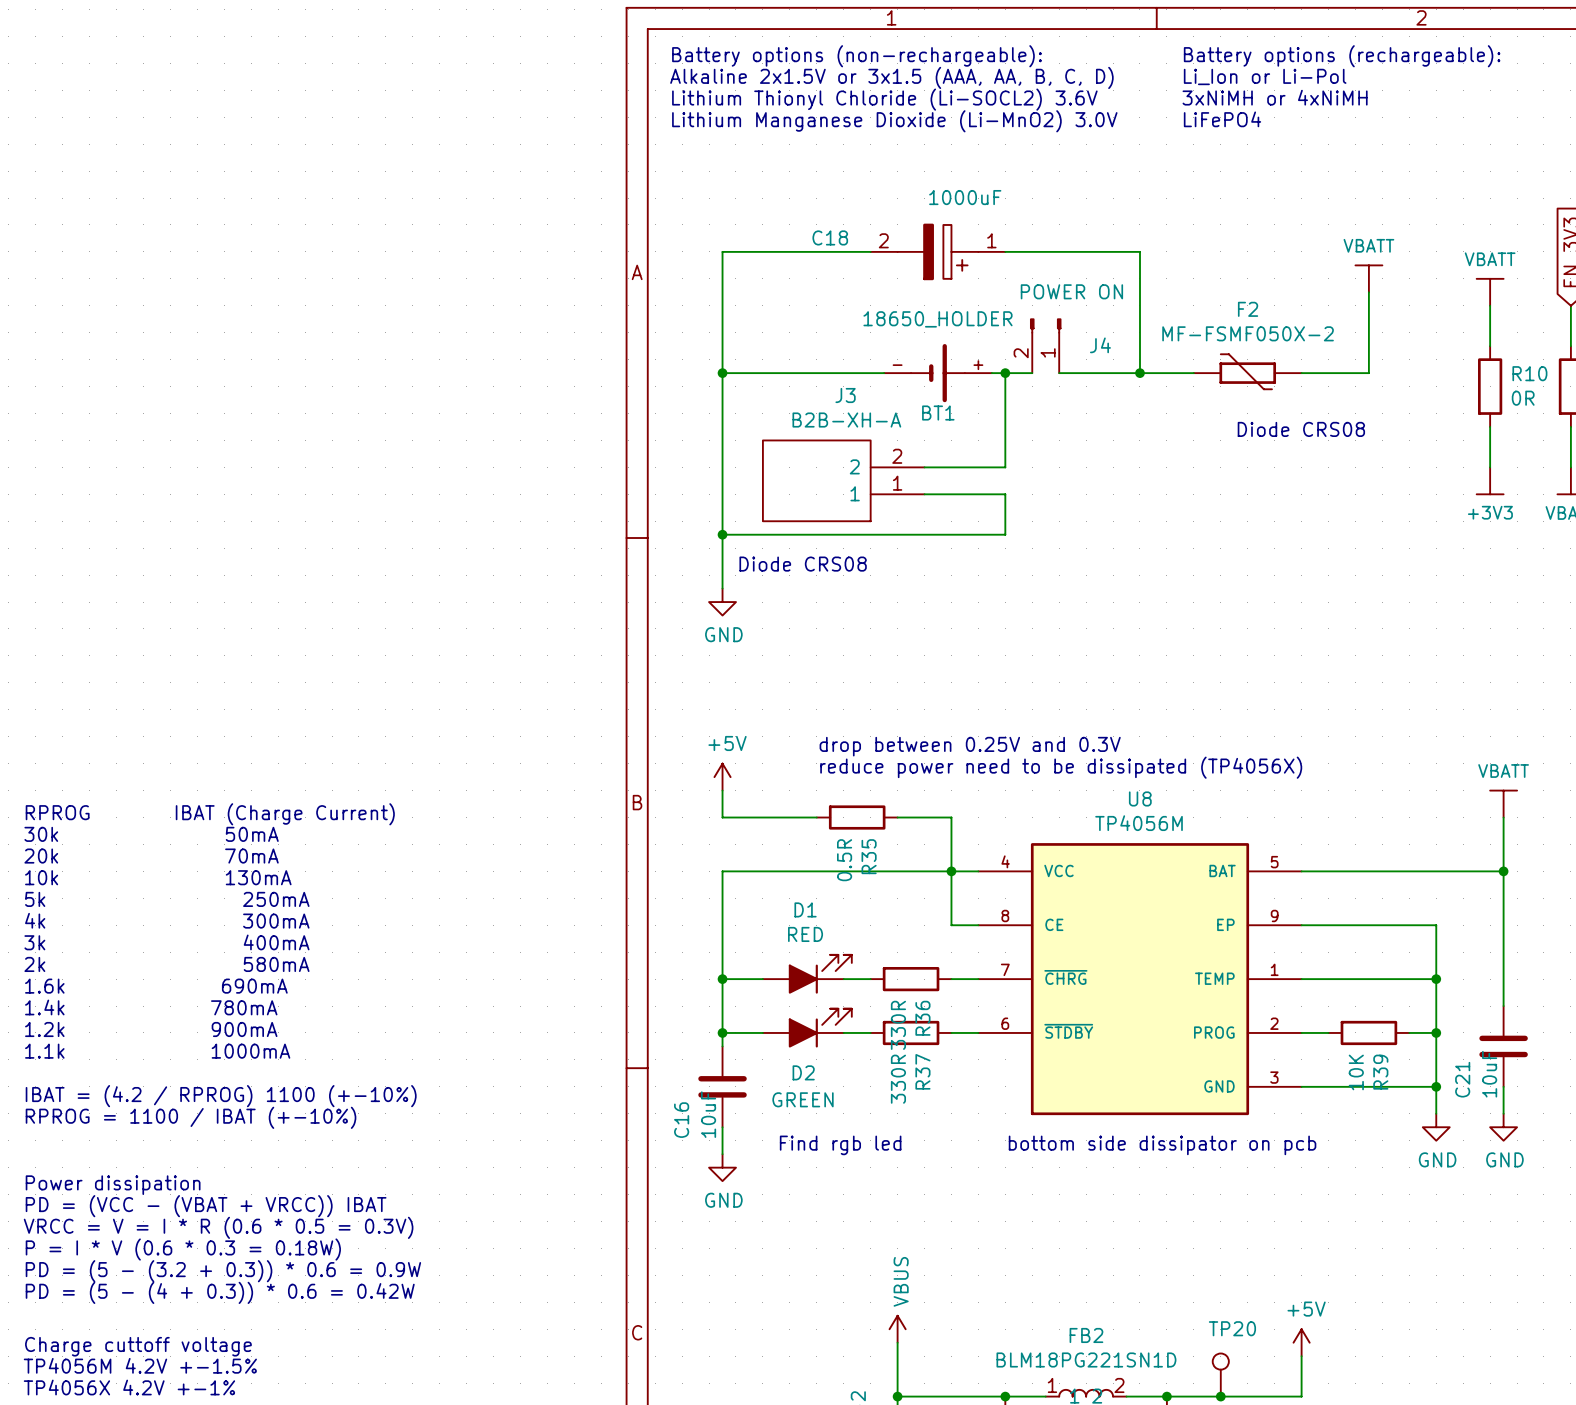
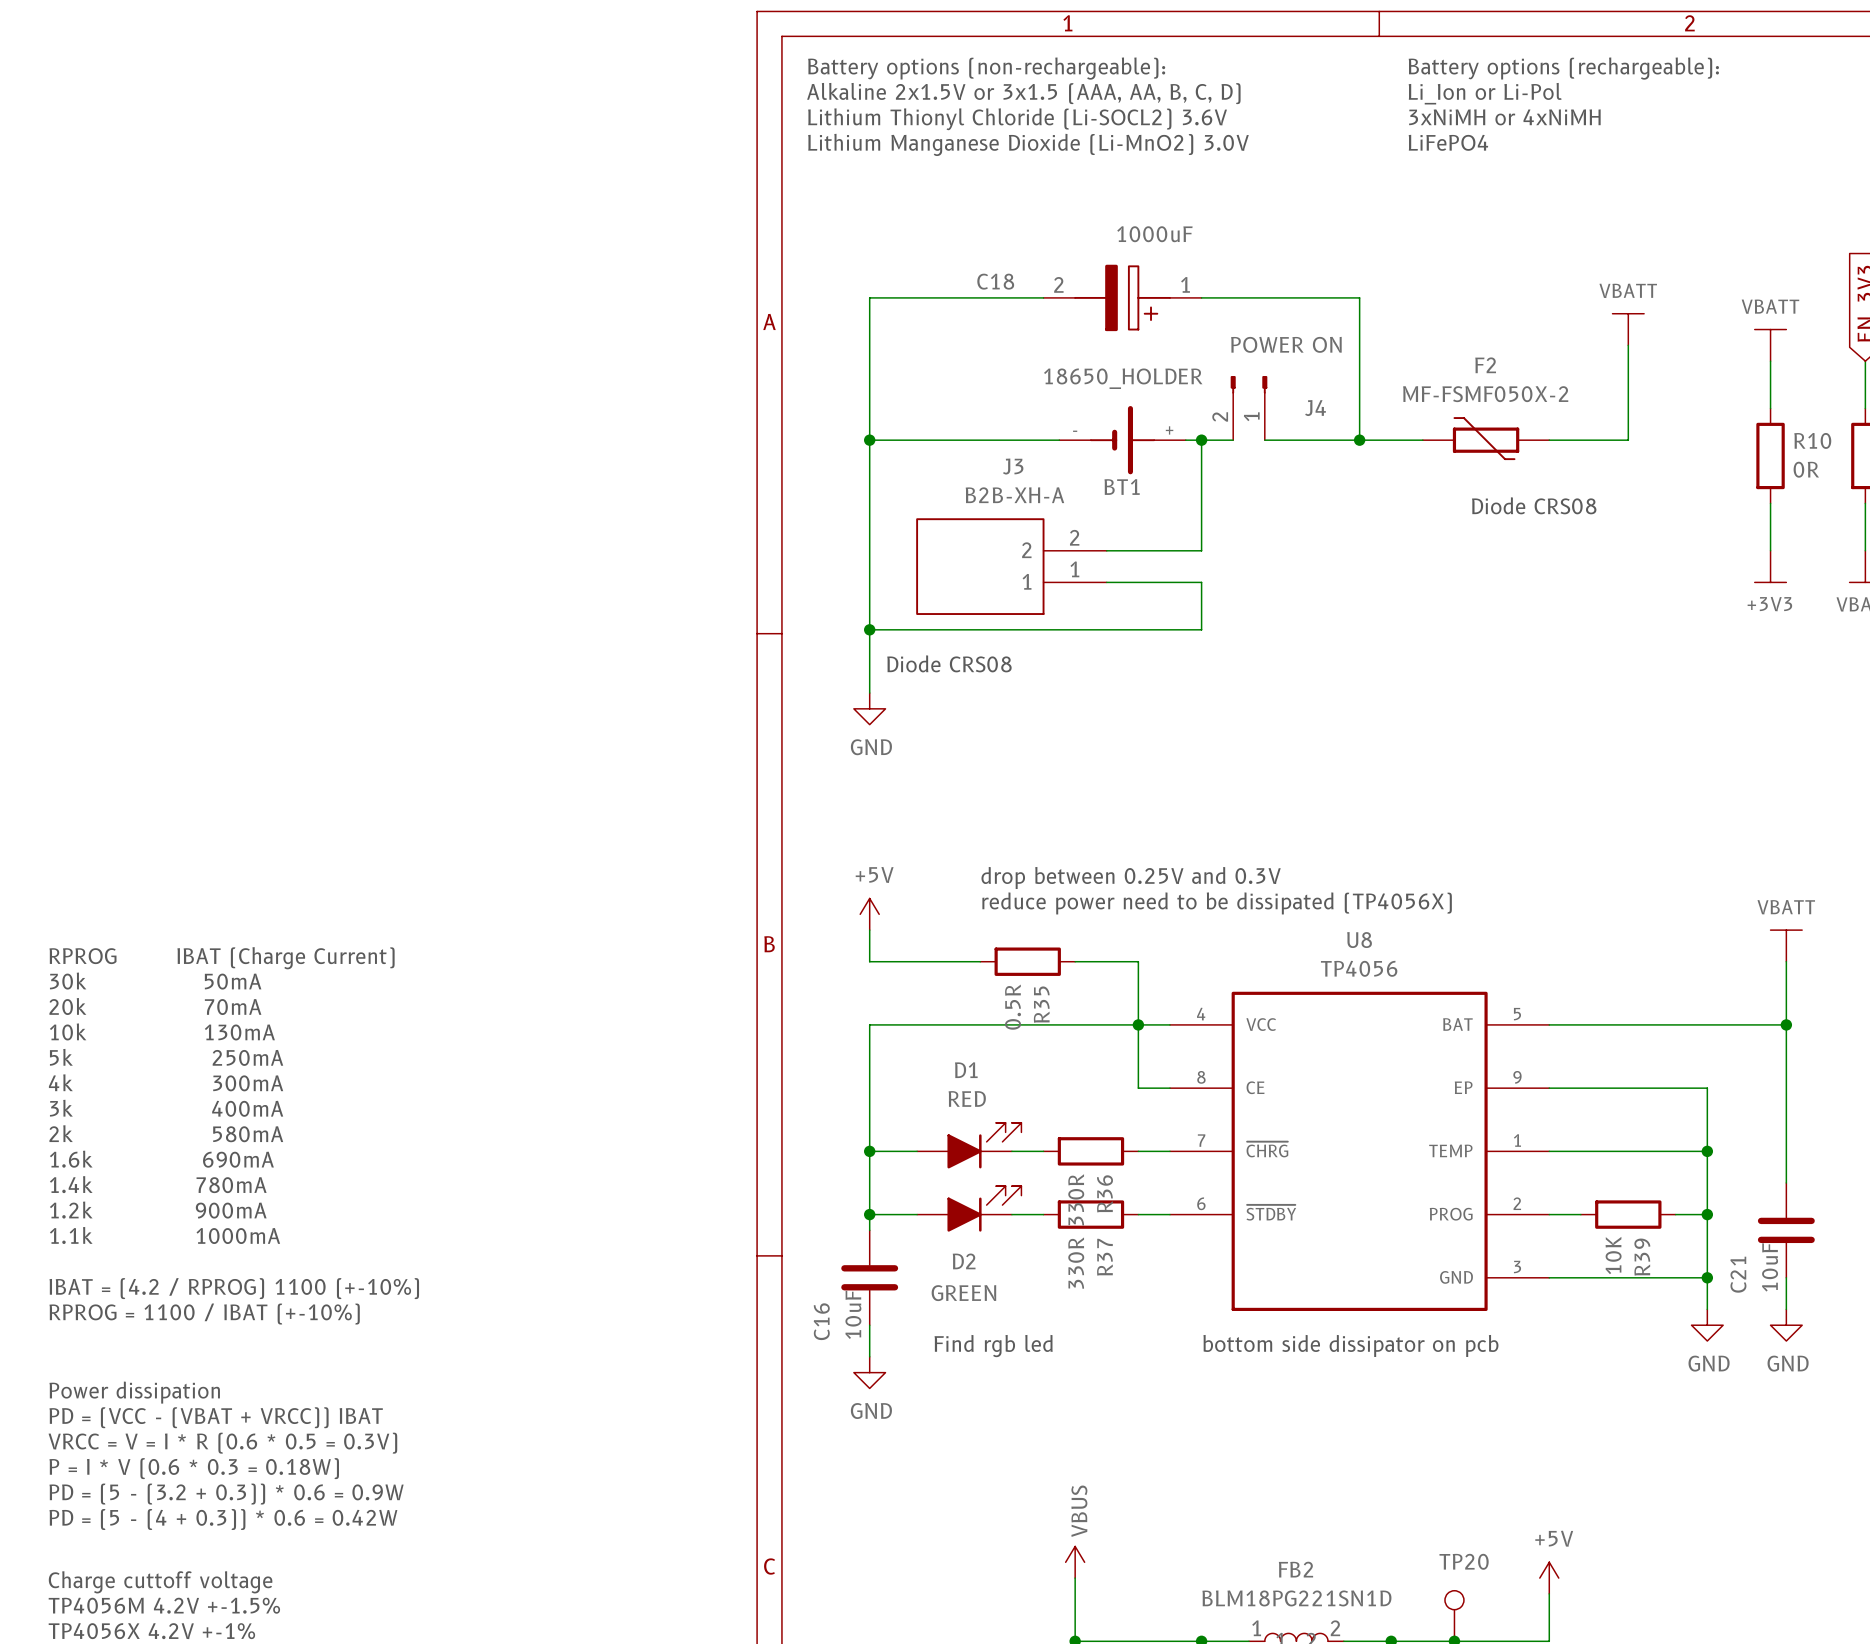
U8 value: TP4056M (1139, 823) -> TP4056 (1359, 968)

